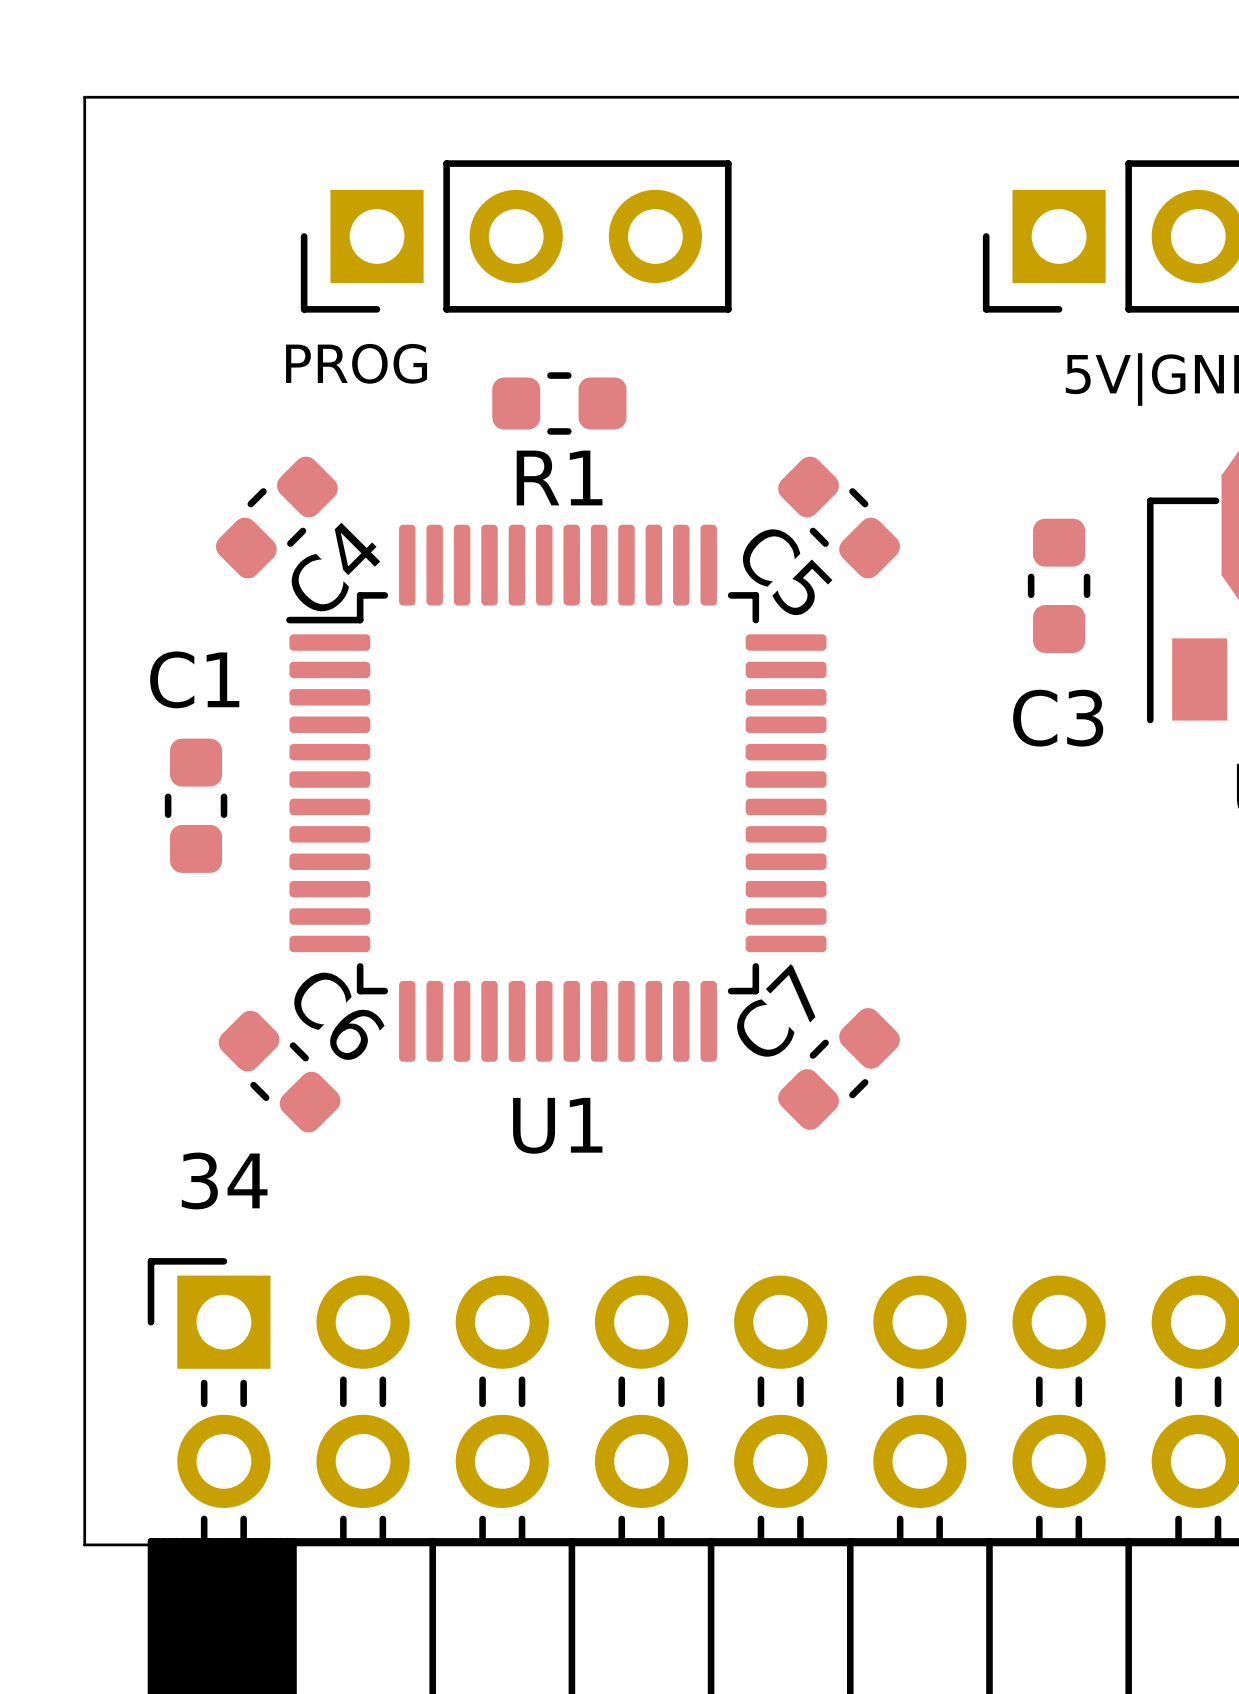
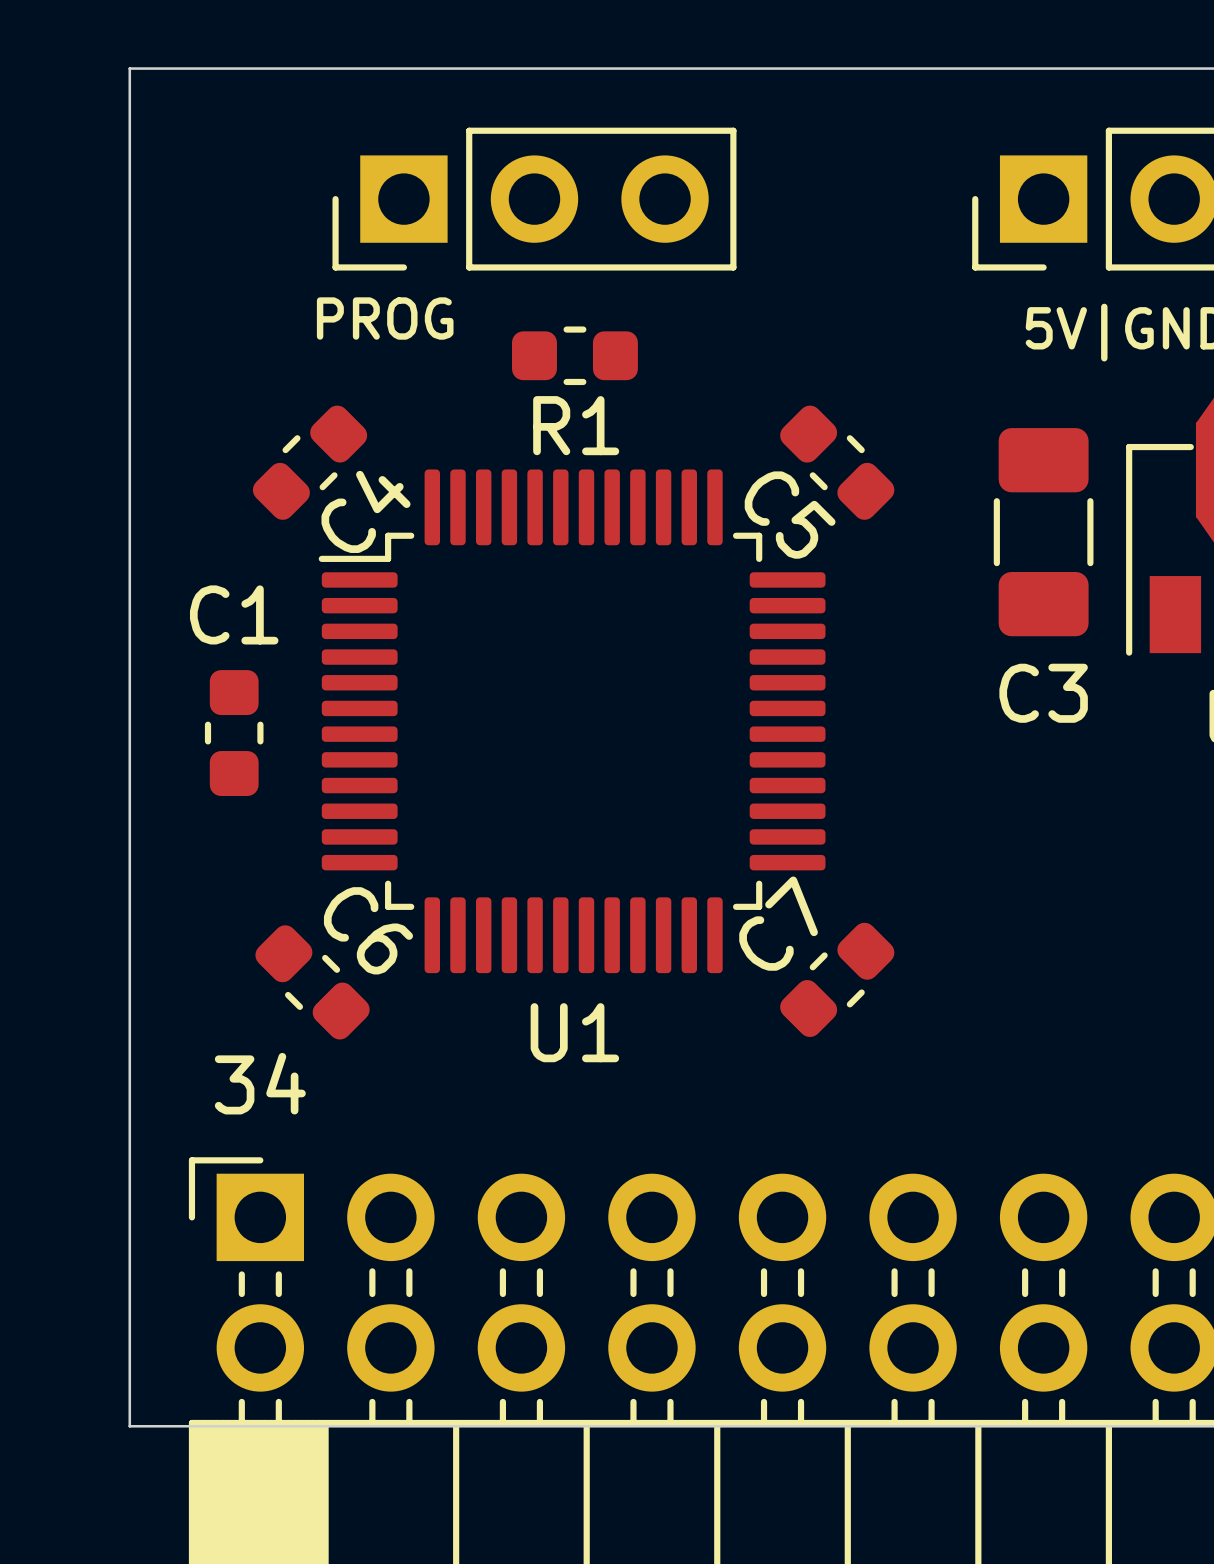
C3 footprint: [1027, 518, 1091, 653] -> [993, 428, 1094, 637]
C3 name position: C3 (1058, 718) -> C3 (1043, 693)

